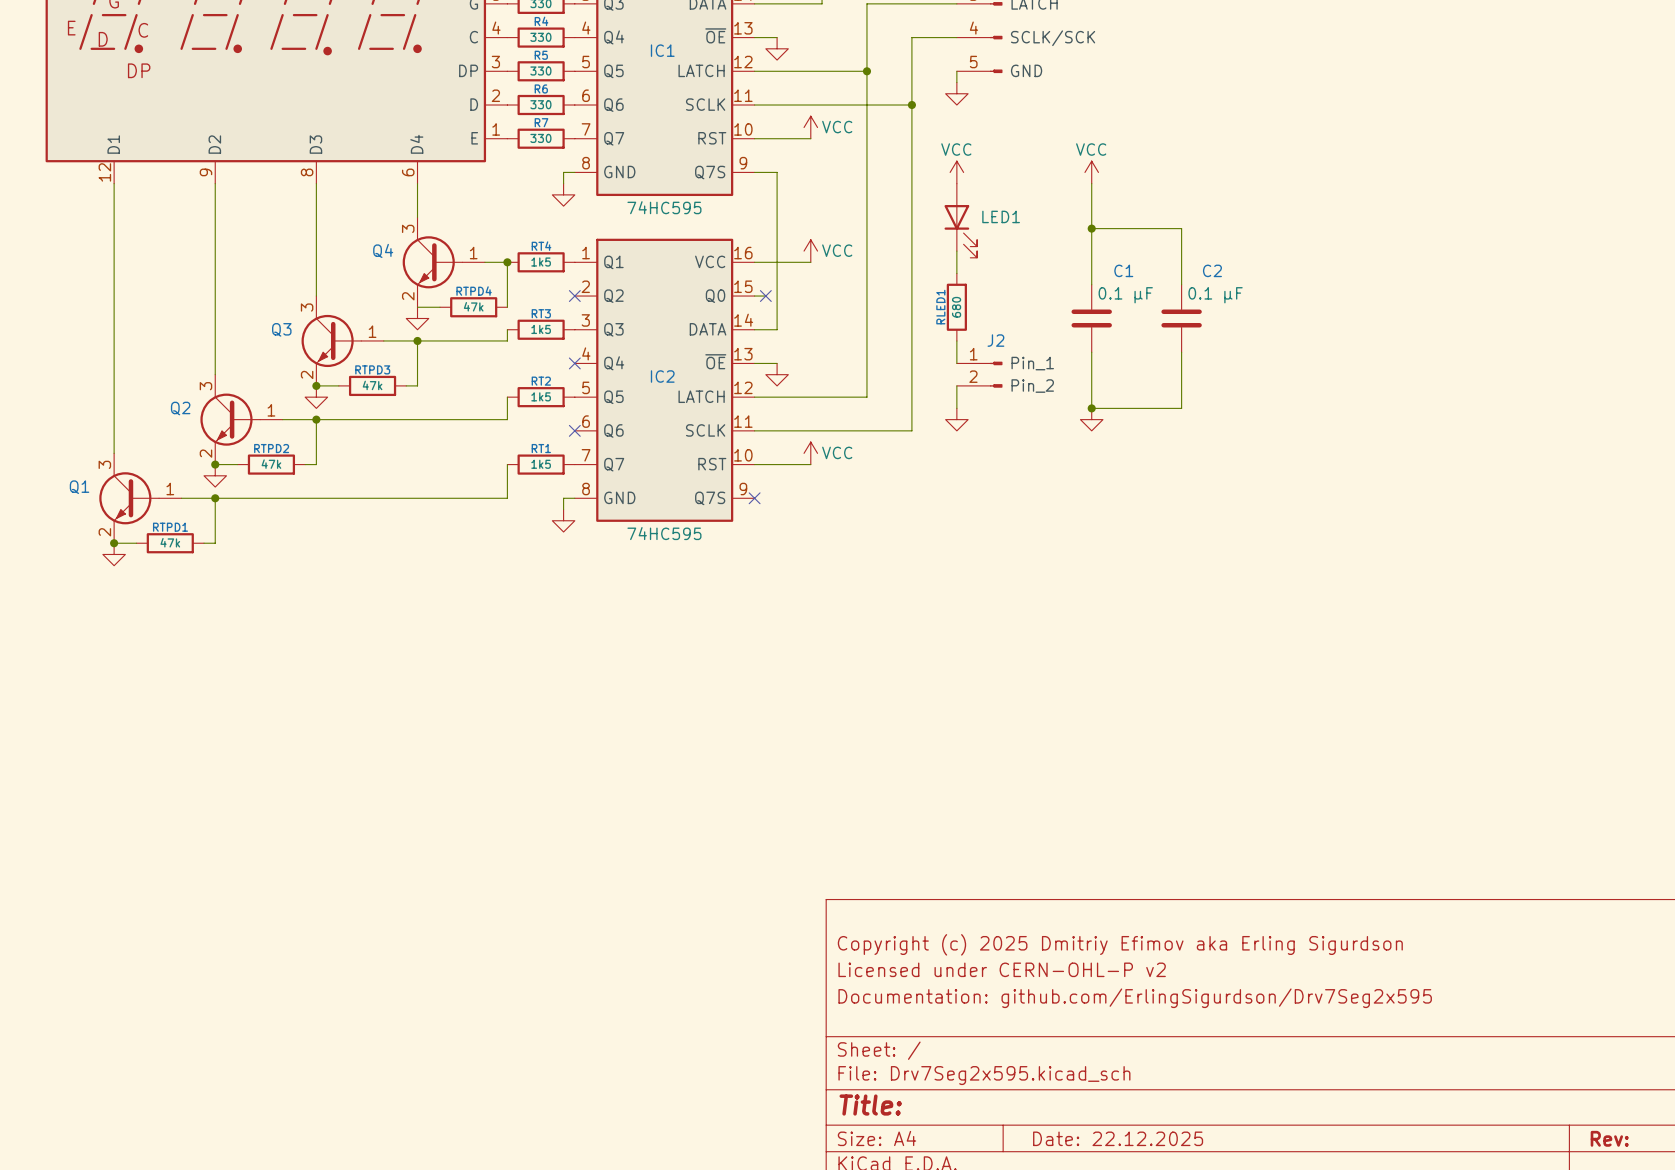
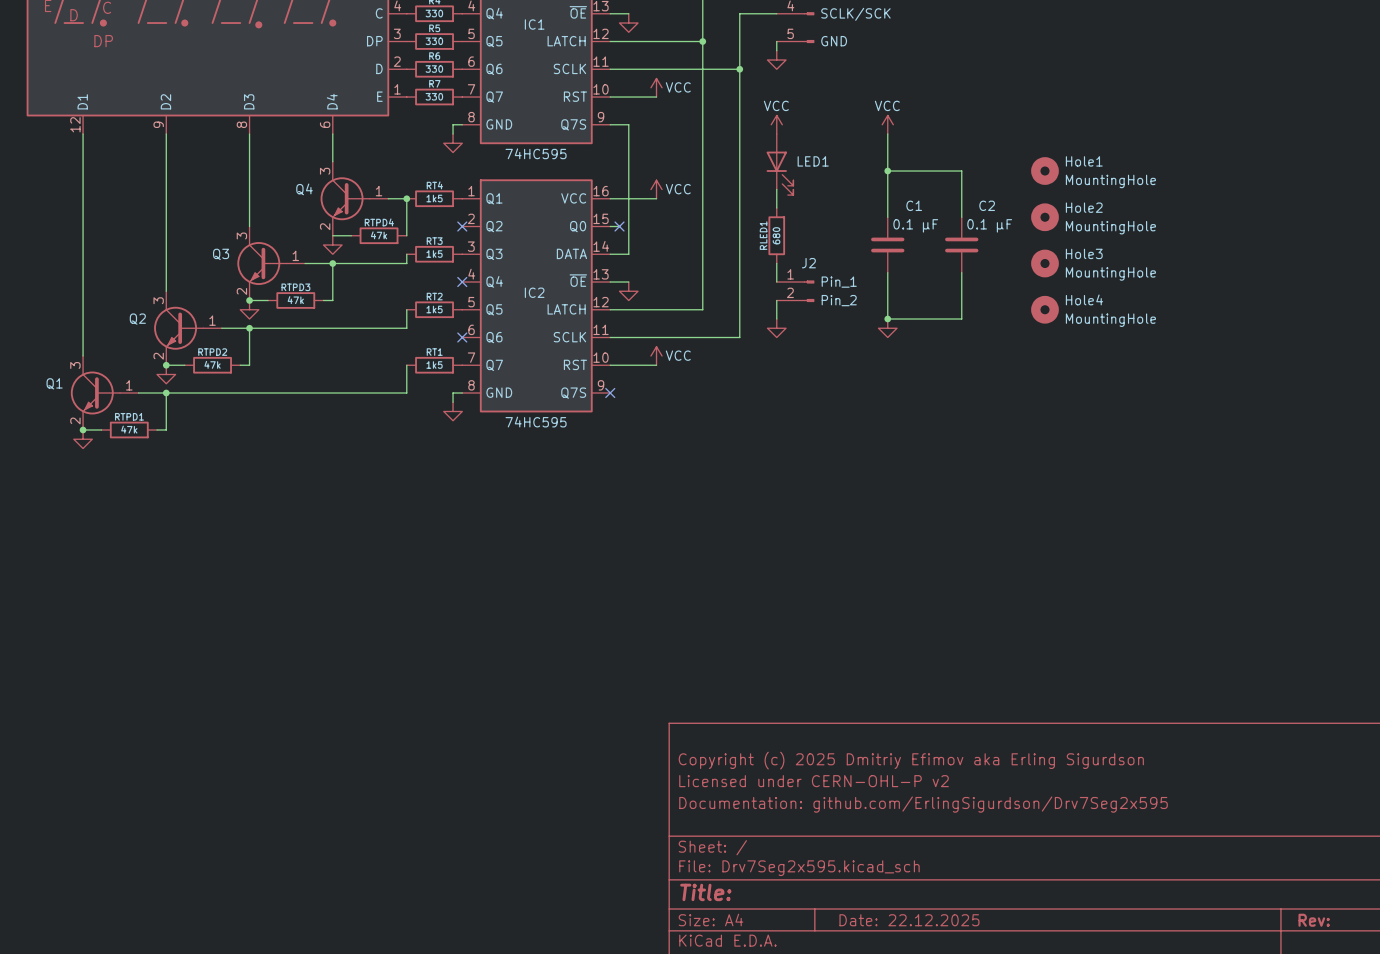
Hole1: none -> MountingHole (1044, 171)
Hole2: none -> MountingHole (1044, 217)
Hole3: none -> MountingHole (1044, 263)
Hole4: none -> MountingHole (1044, 309)

